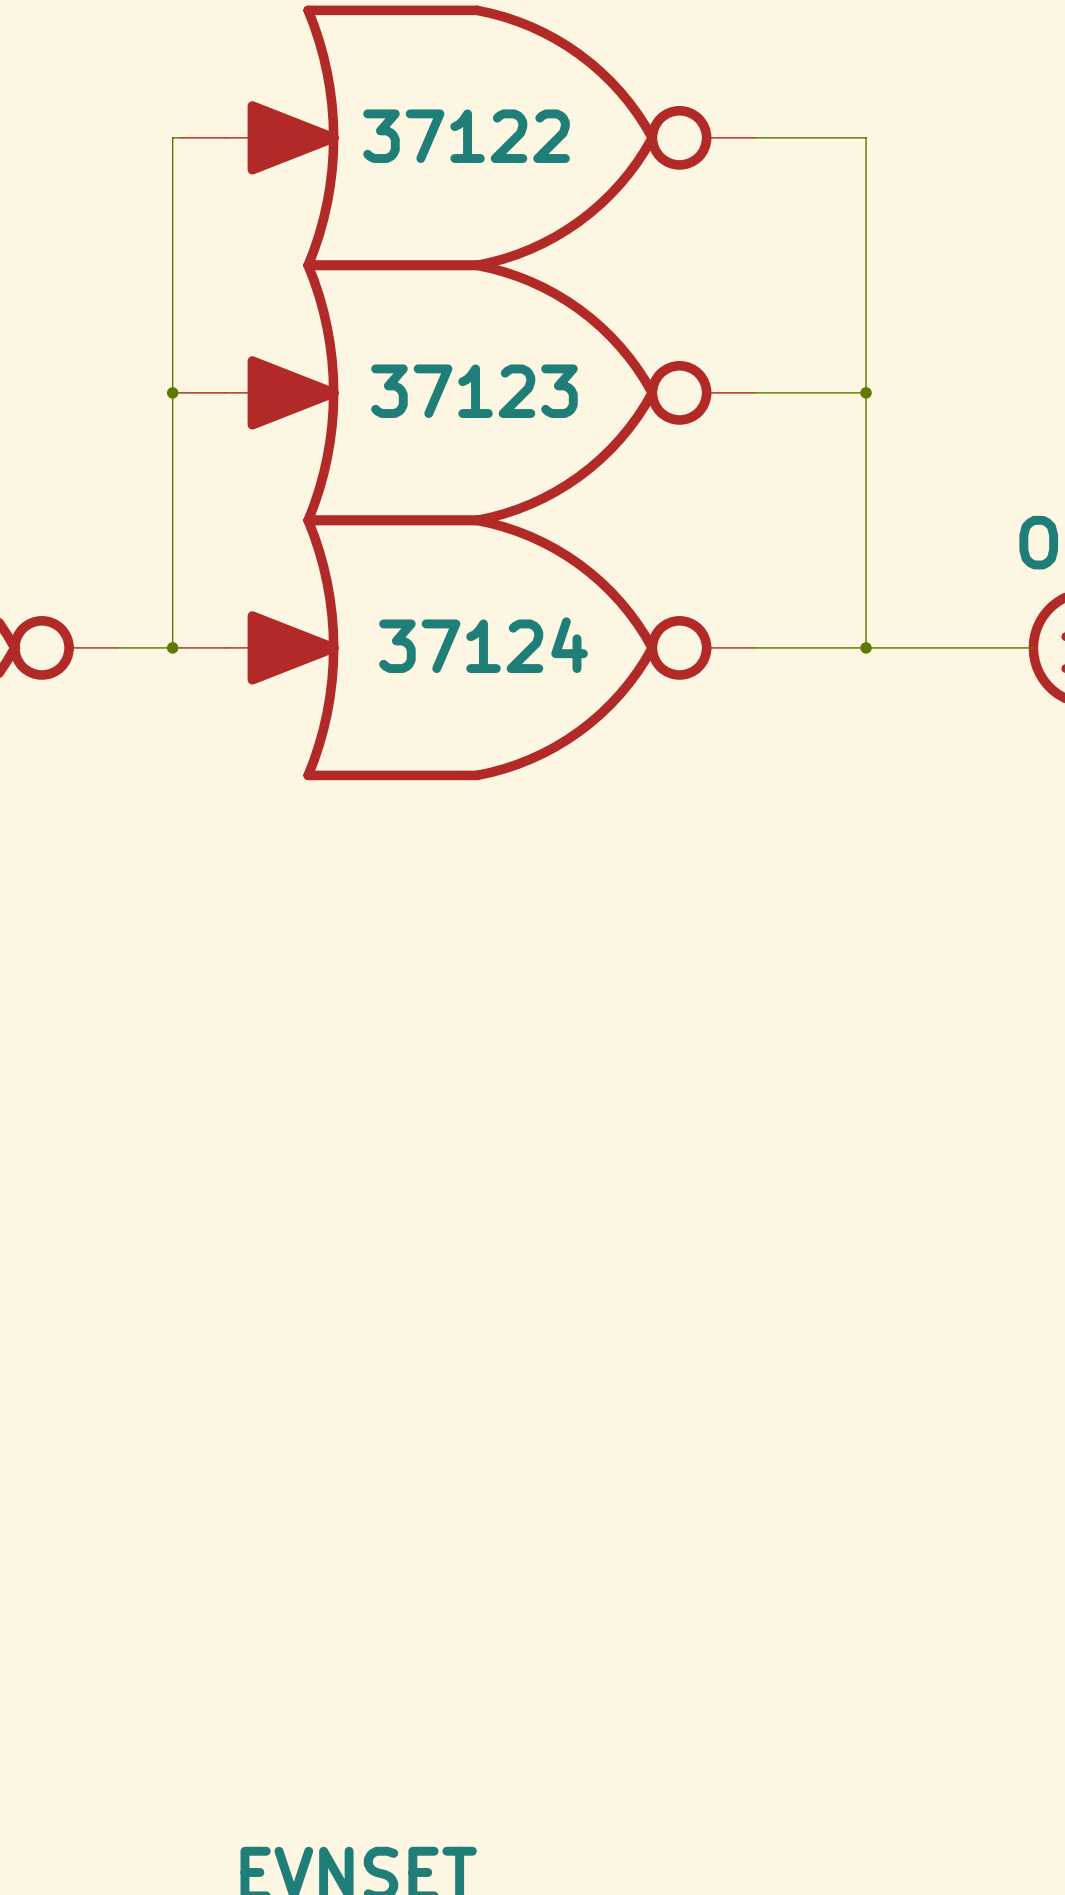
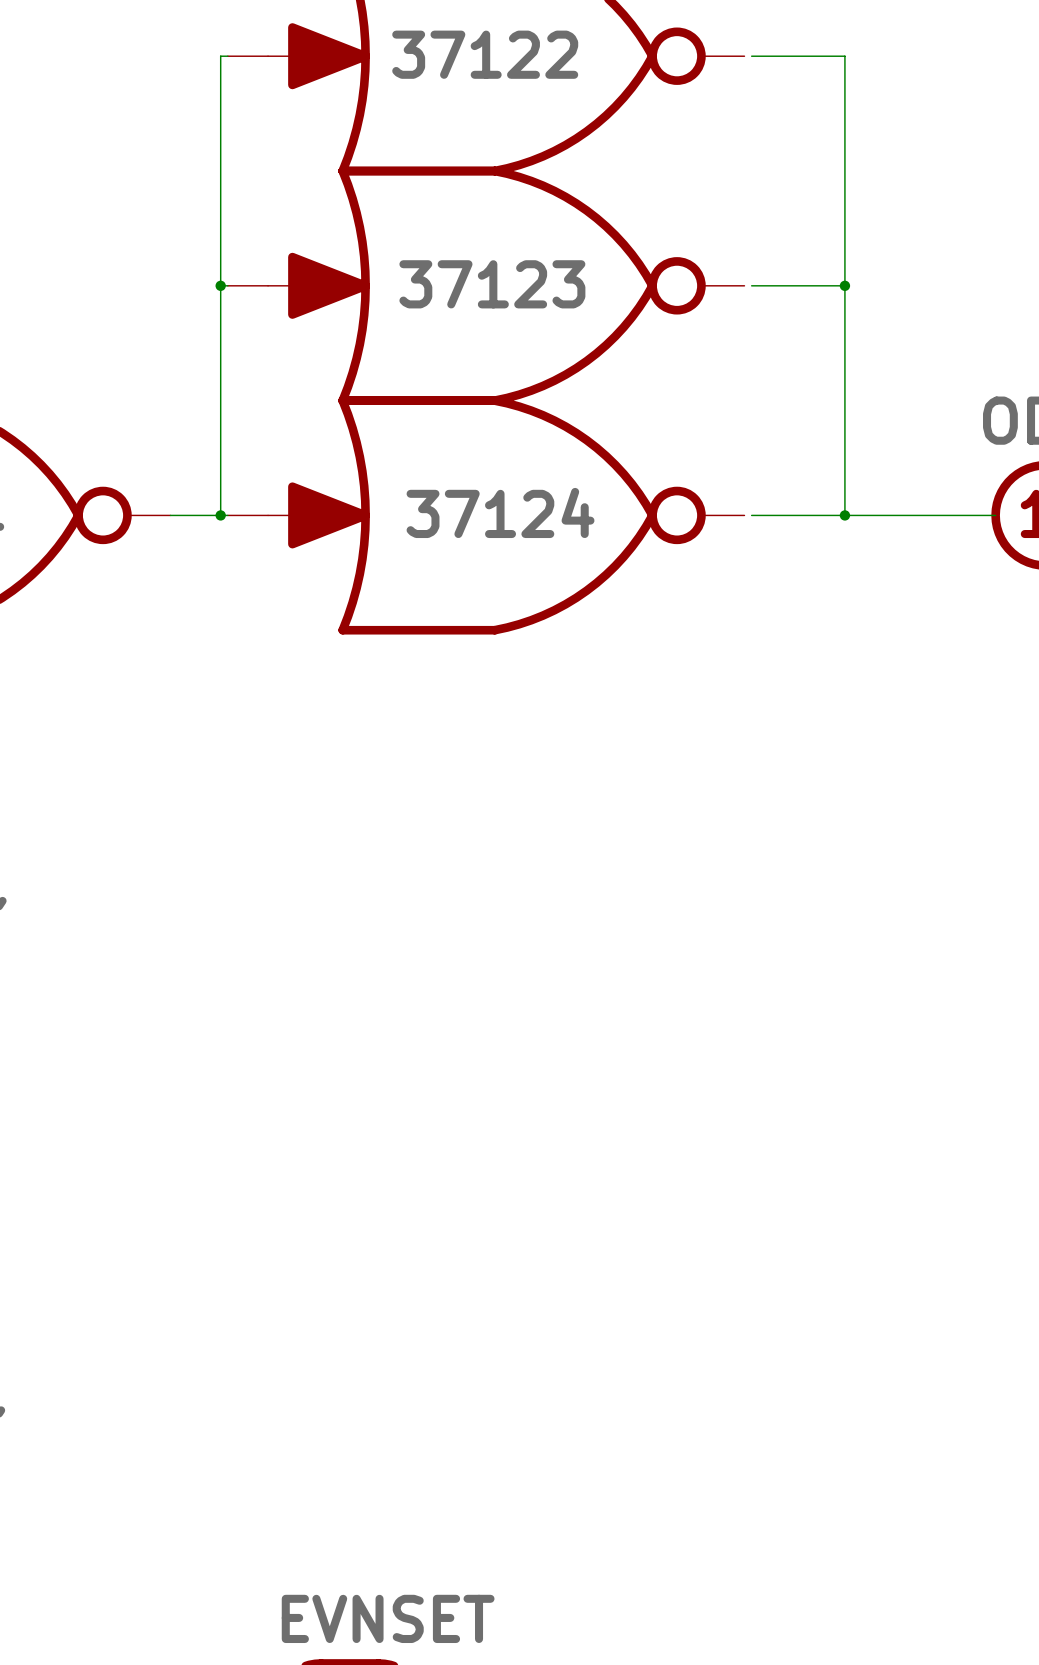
wire: (754, 137) (762, 137) -> none
wire: (754, 392) (762, 392) -> none
wire: (754, 647) (762, 647) -> none

